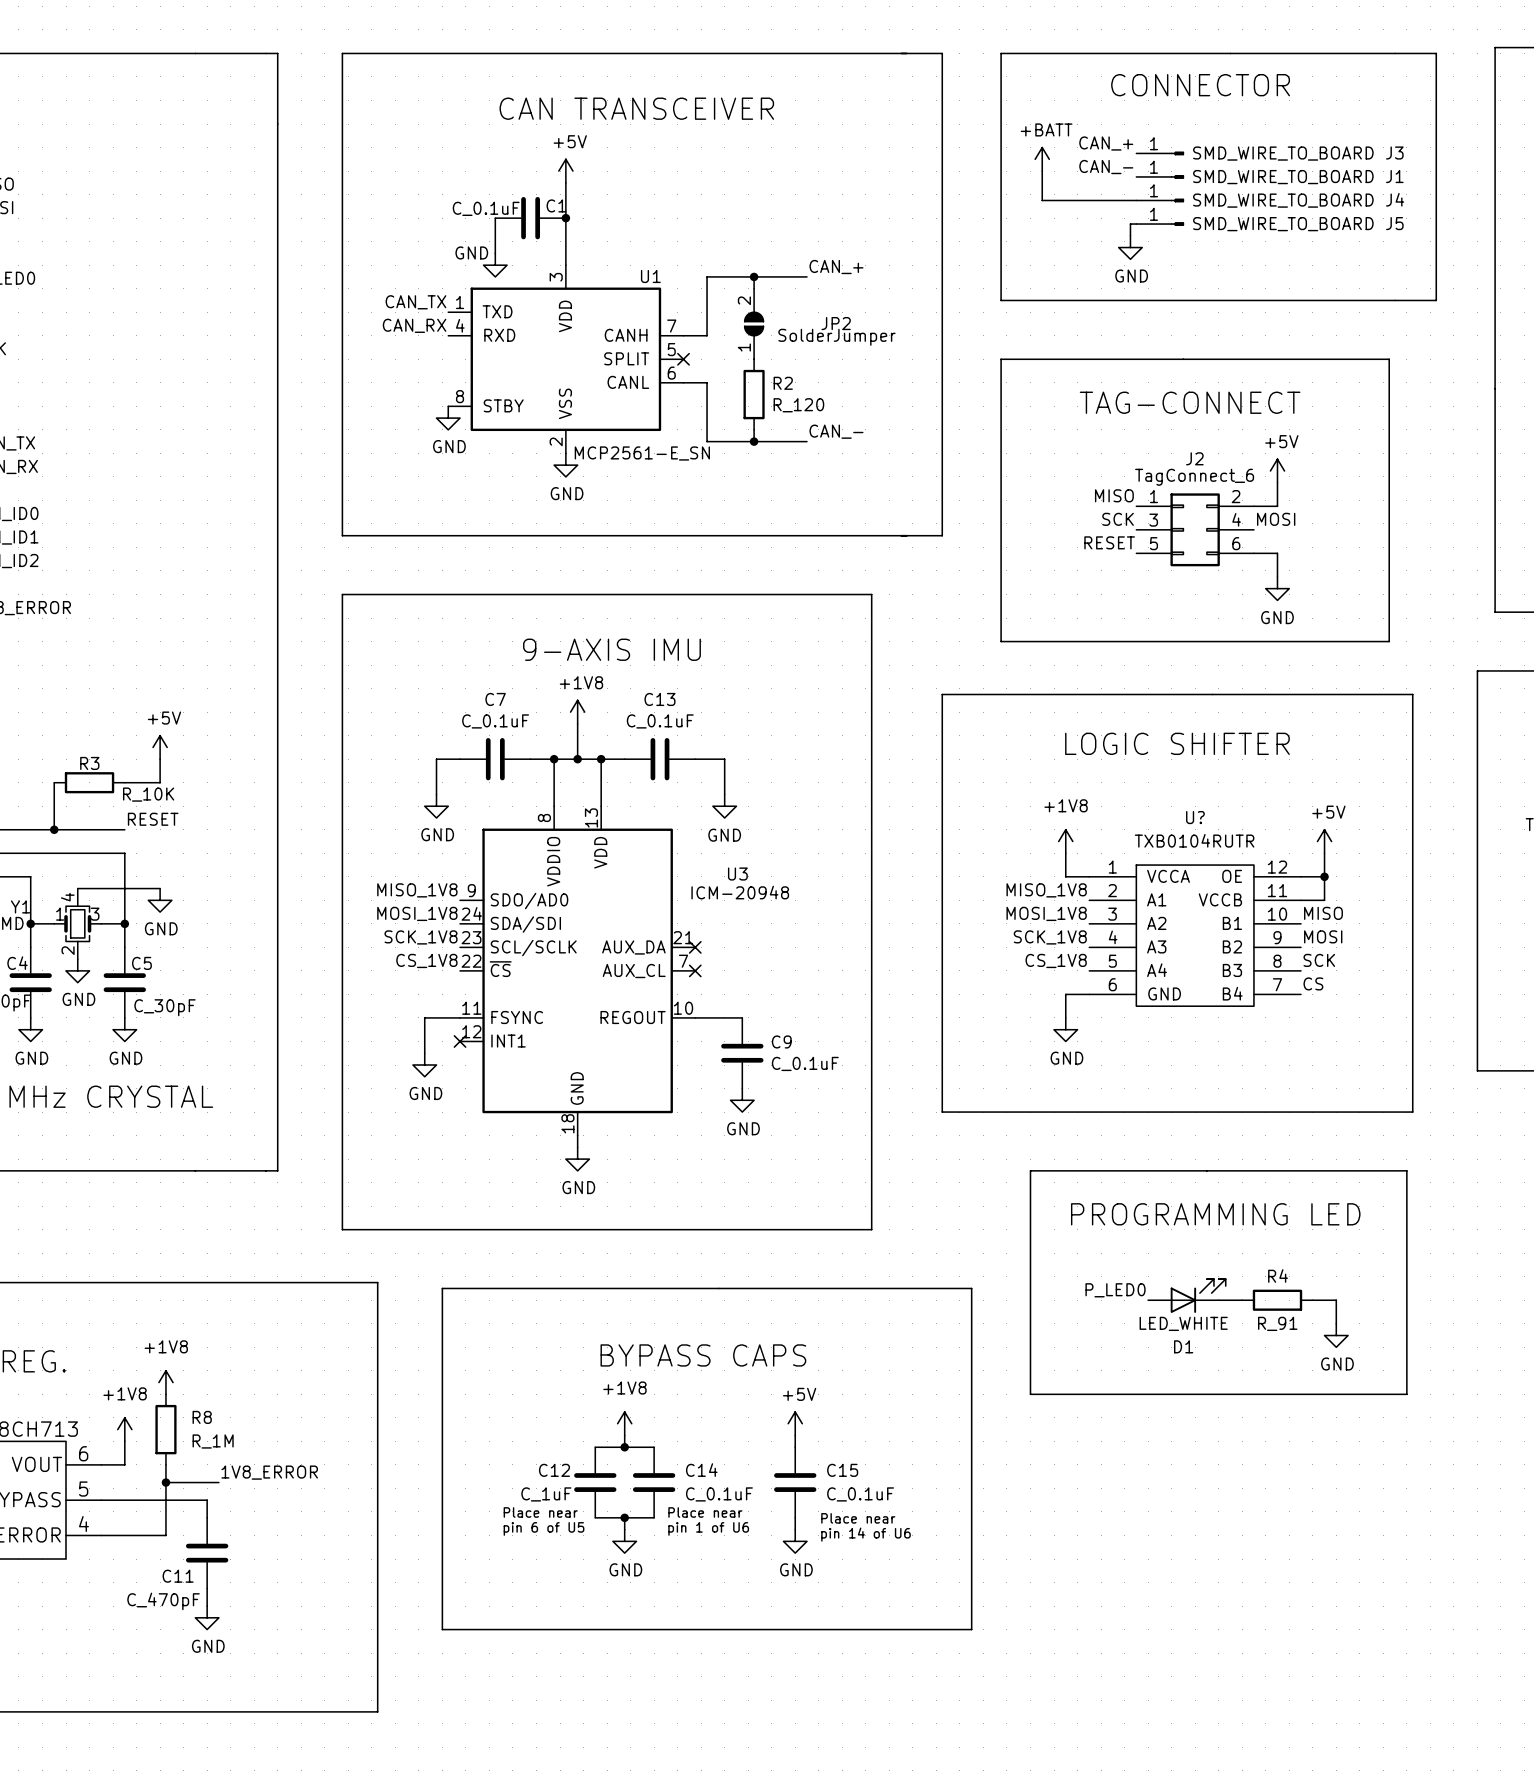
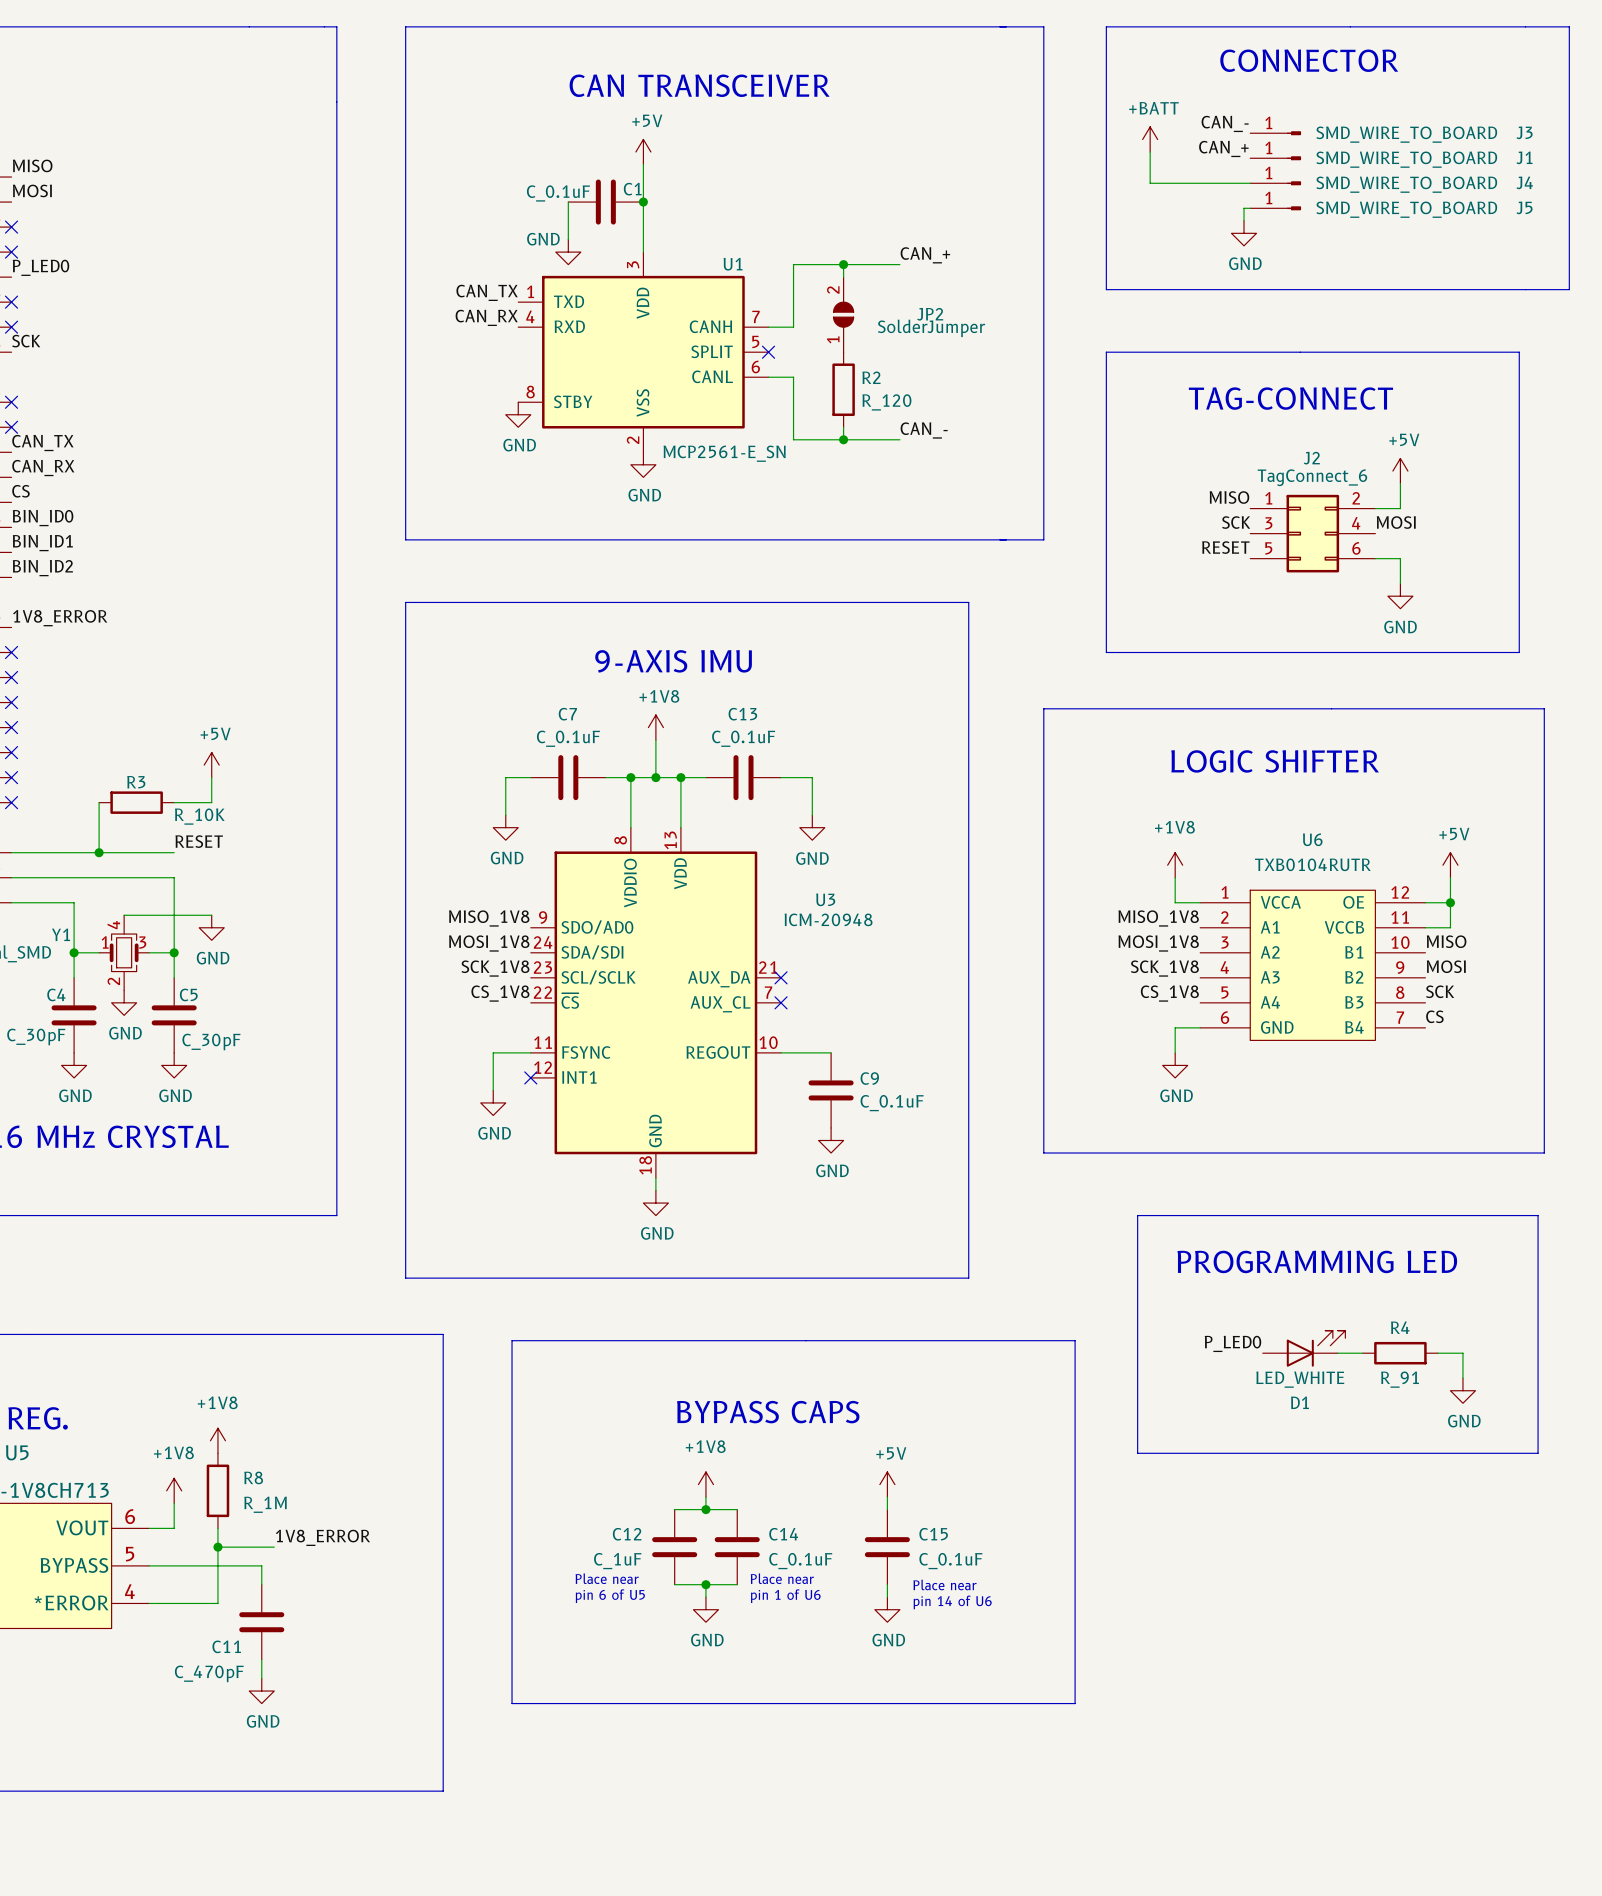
label: CAN_+ (1106, 143) -> CAN_- (1225, 123)
label: CAN_- (1106, 167) -> CAN_+ (1223, 148)
U? name: U? (1195, 817) -> U6 (1312, 839)

